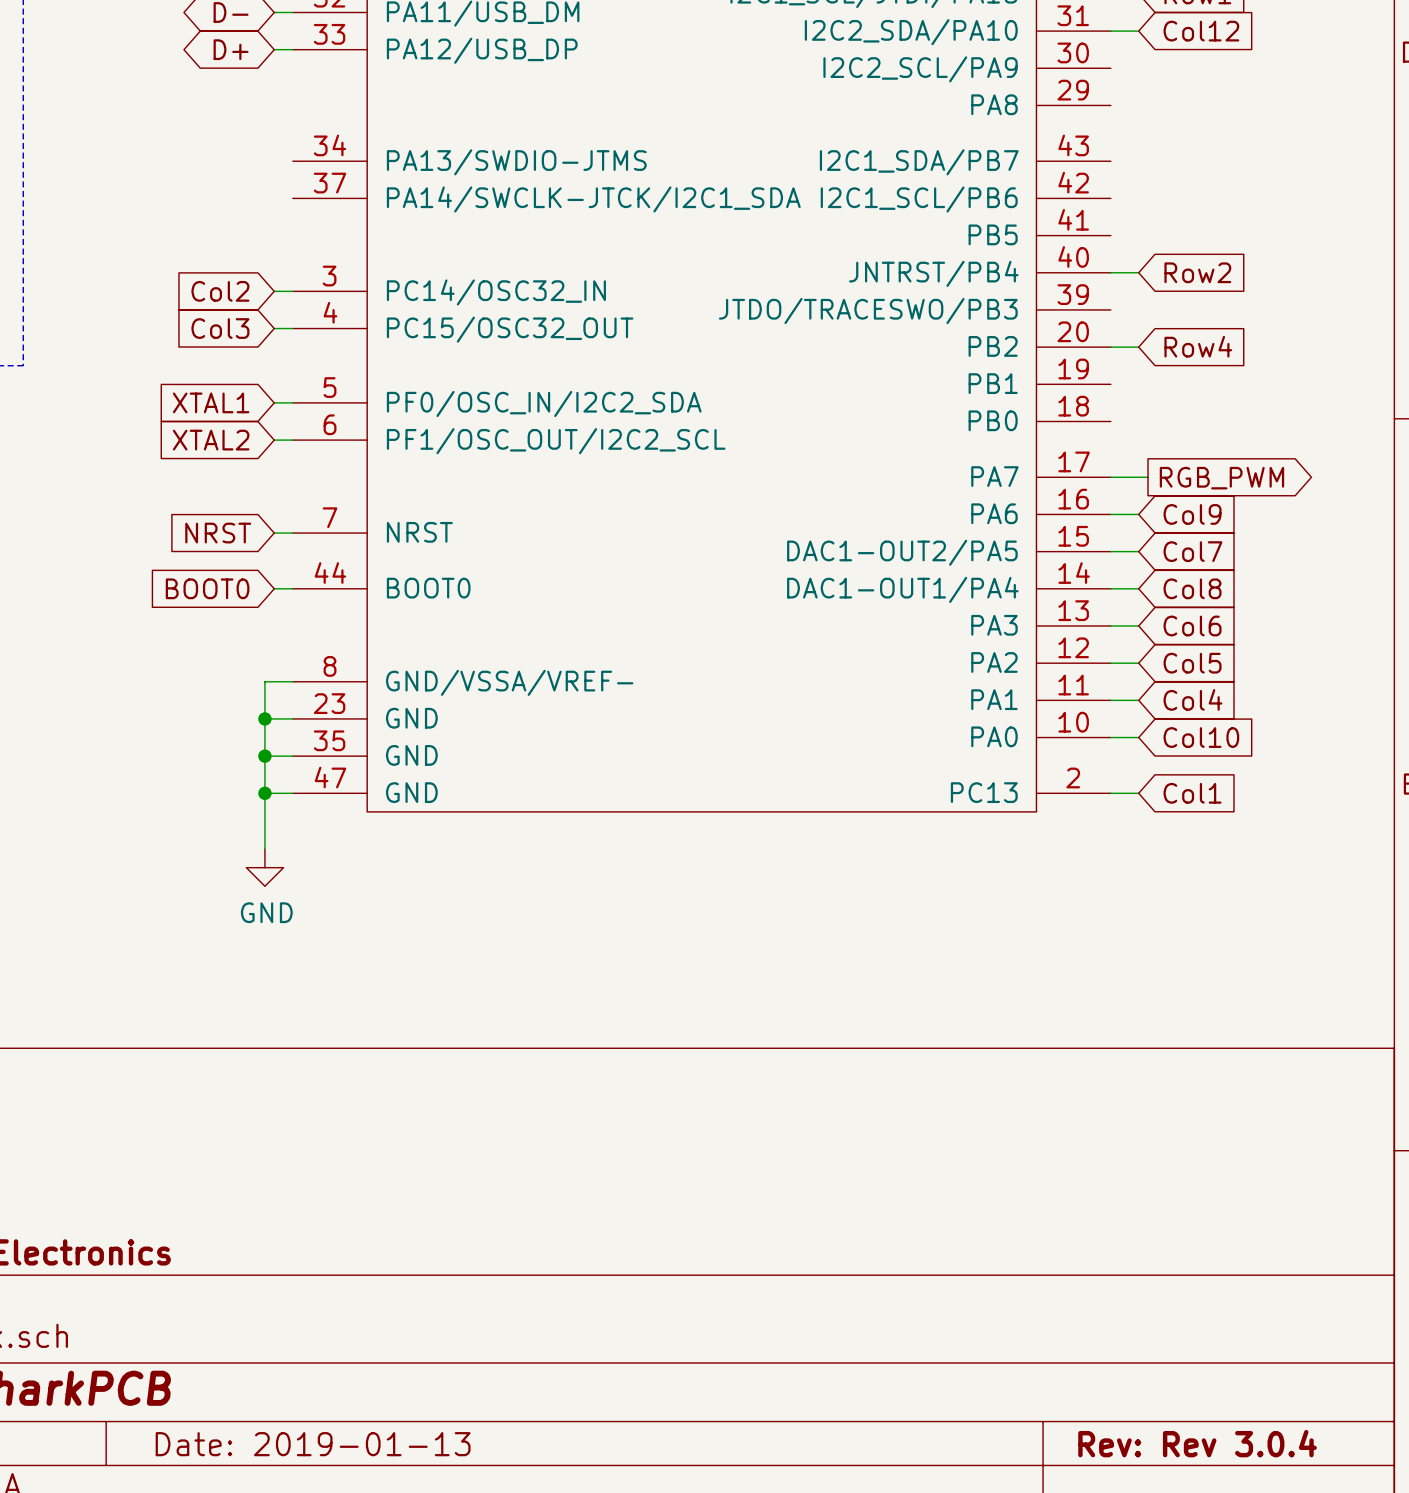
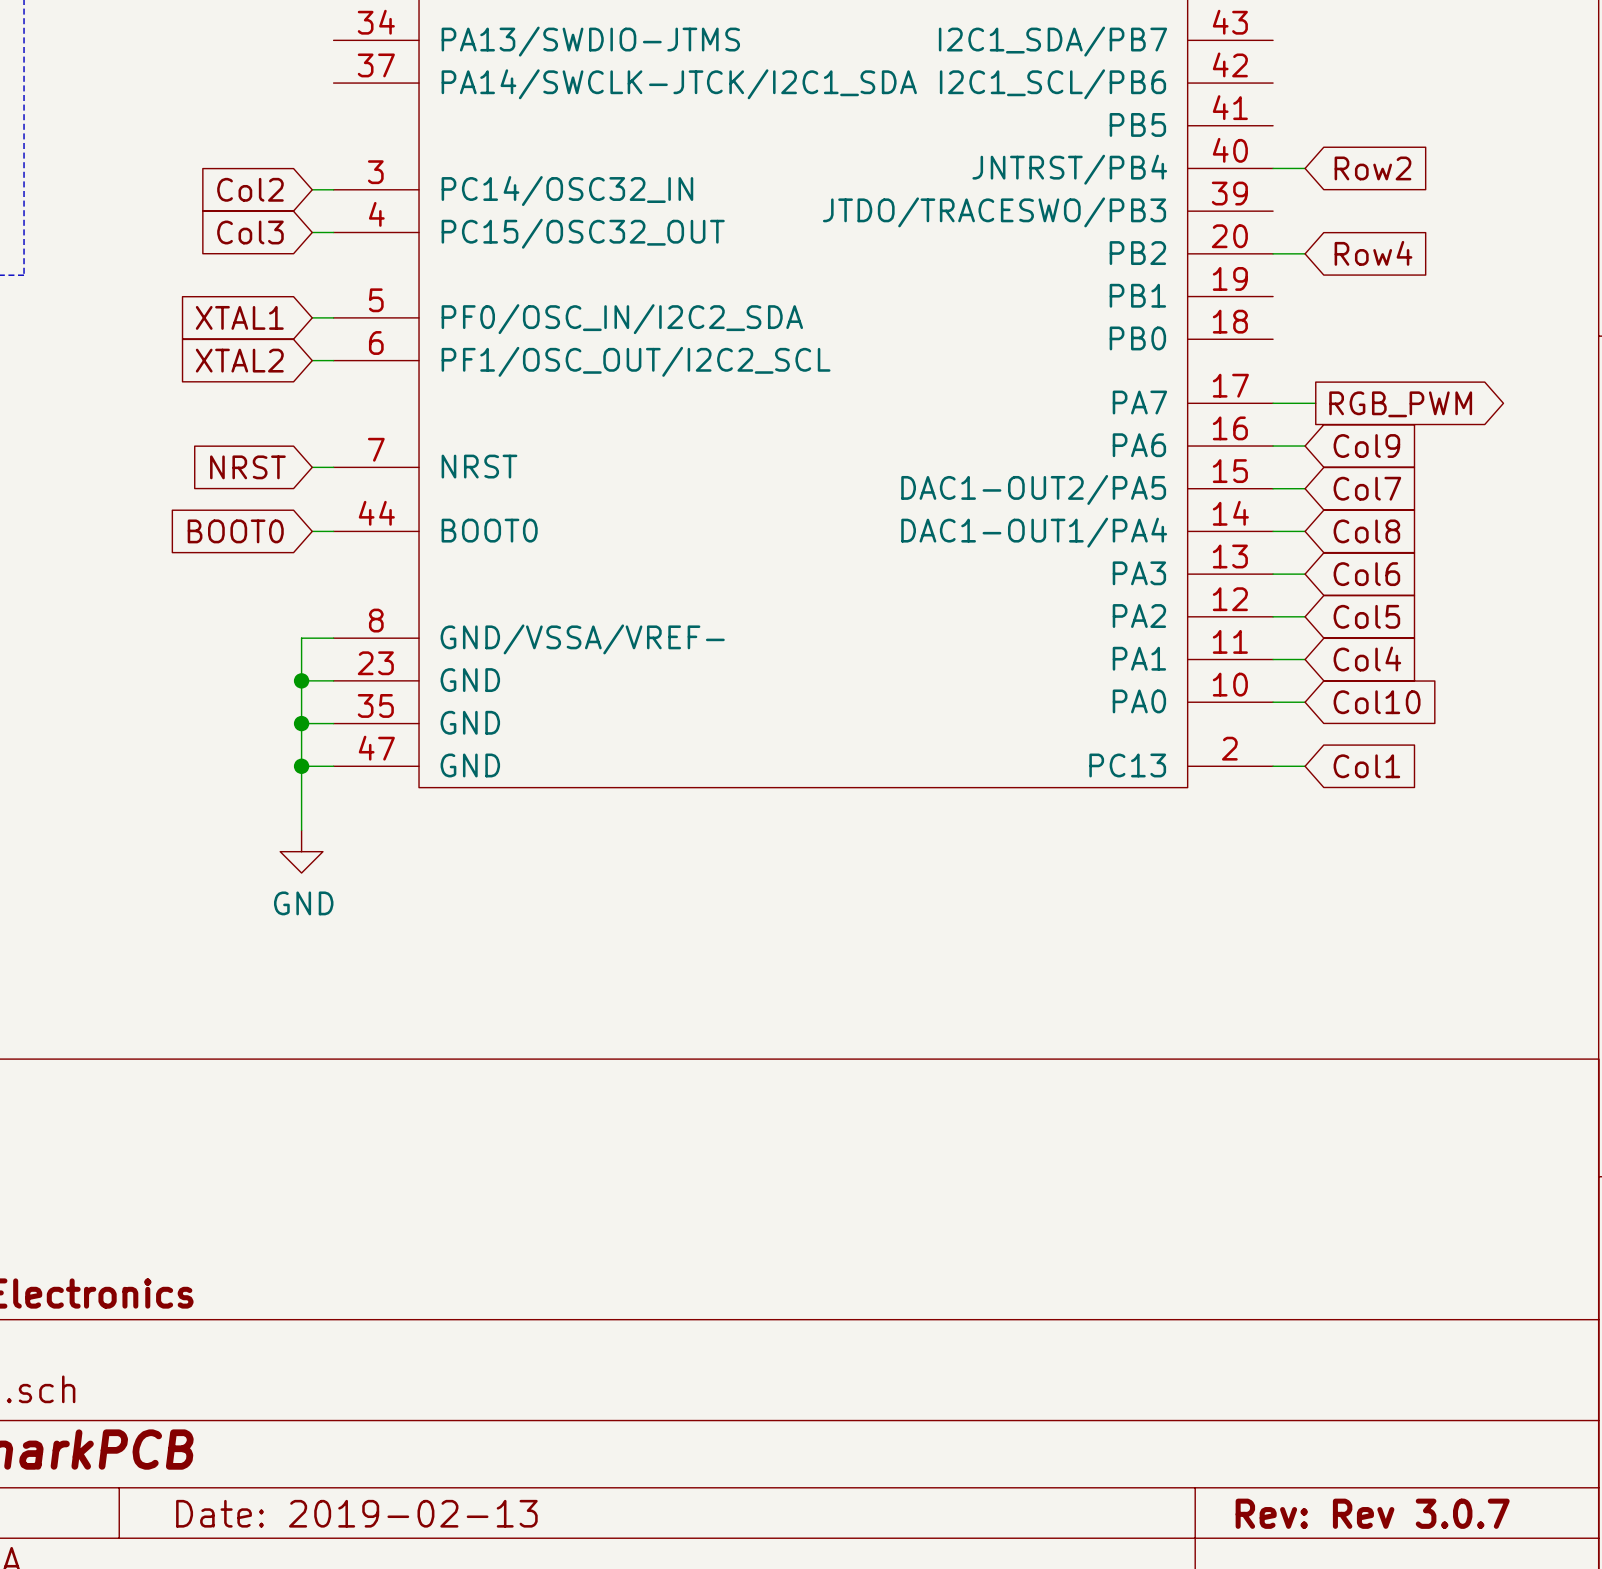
title block: Rev: Rev 3.0.4 (1197, 1443) -> Rev: Rev 3.0.7 (1372, 1513)
title block: Date: 2019-01-13 (313, 1444) -> Date: 2019-02-13 (356, 1513)

